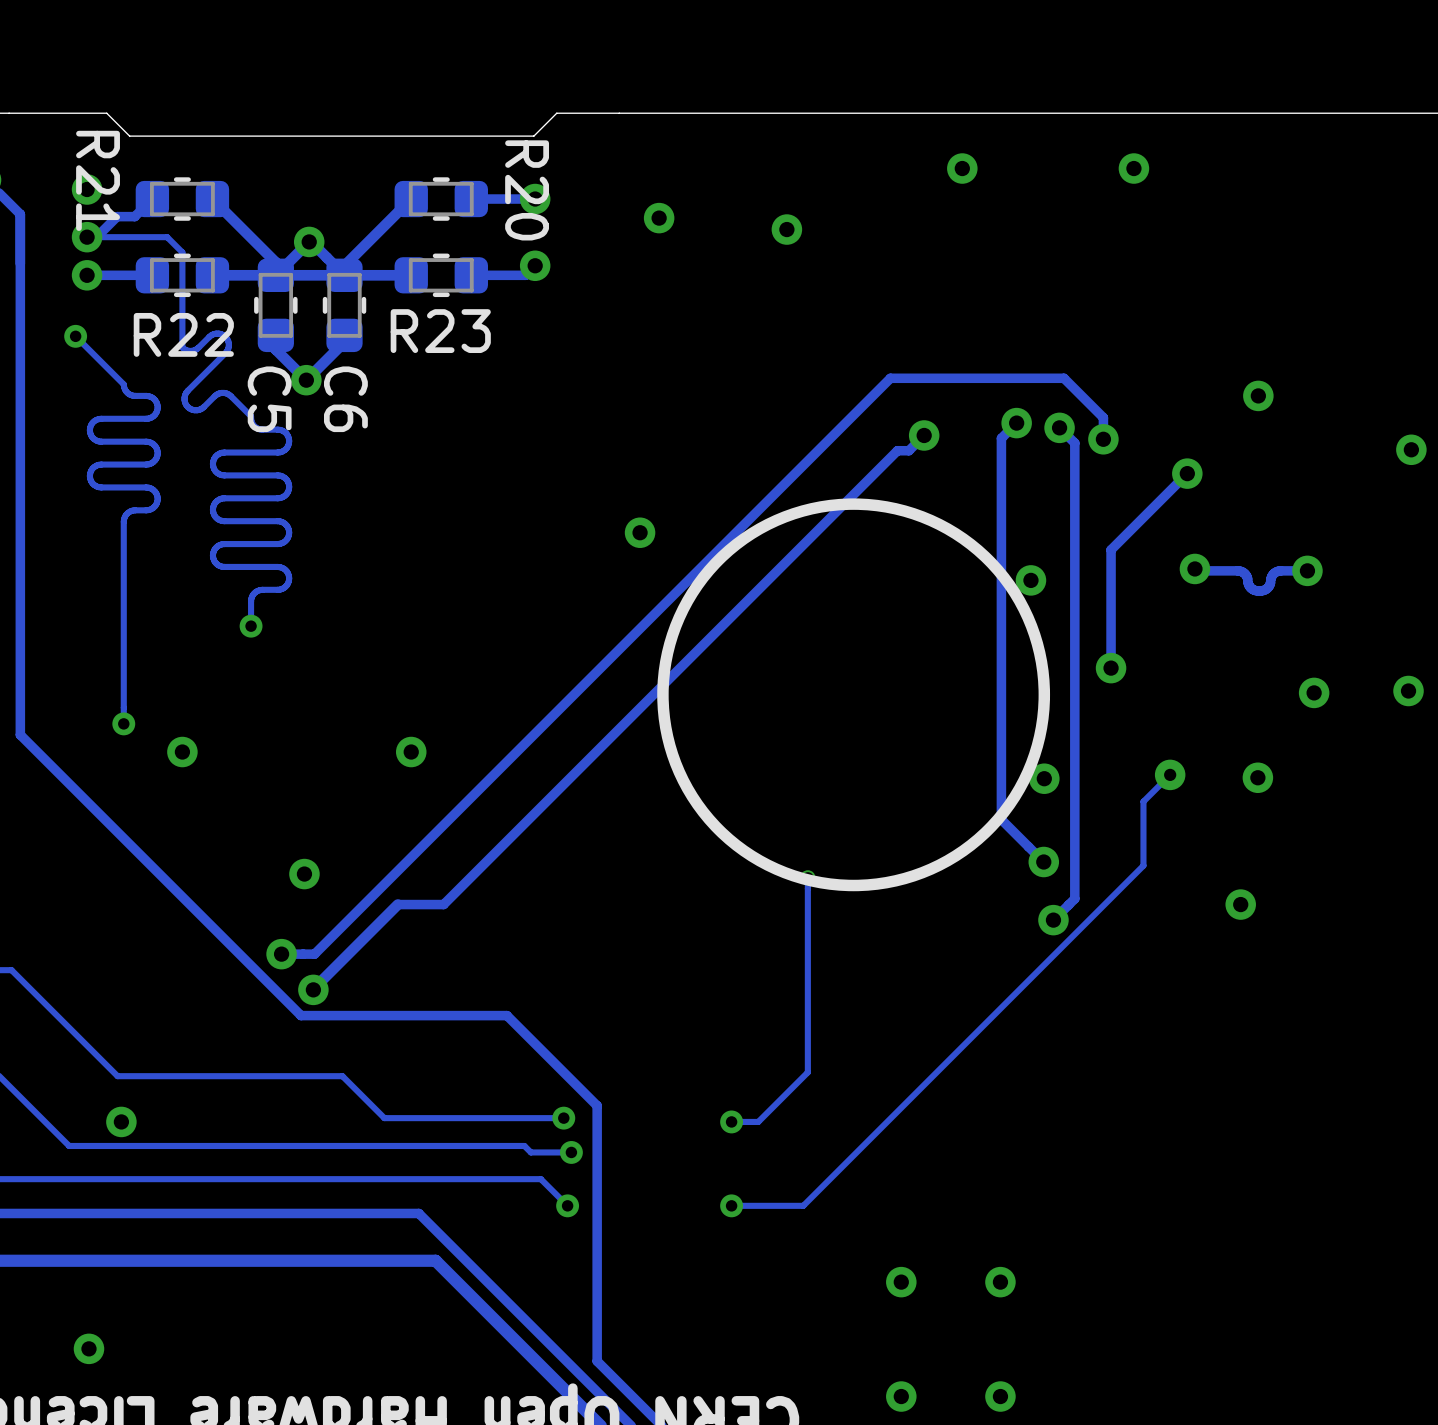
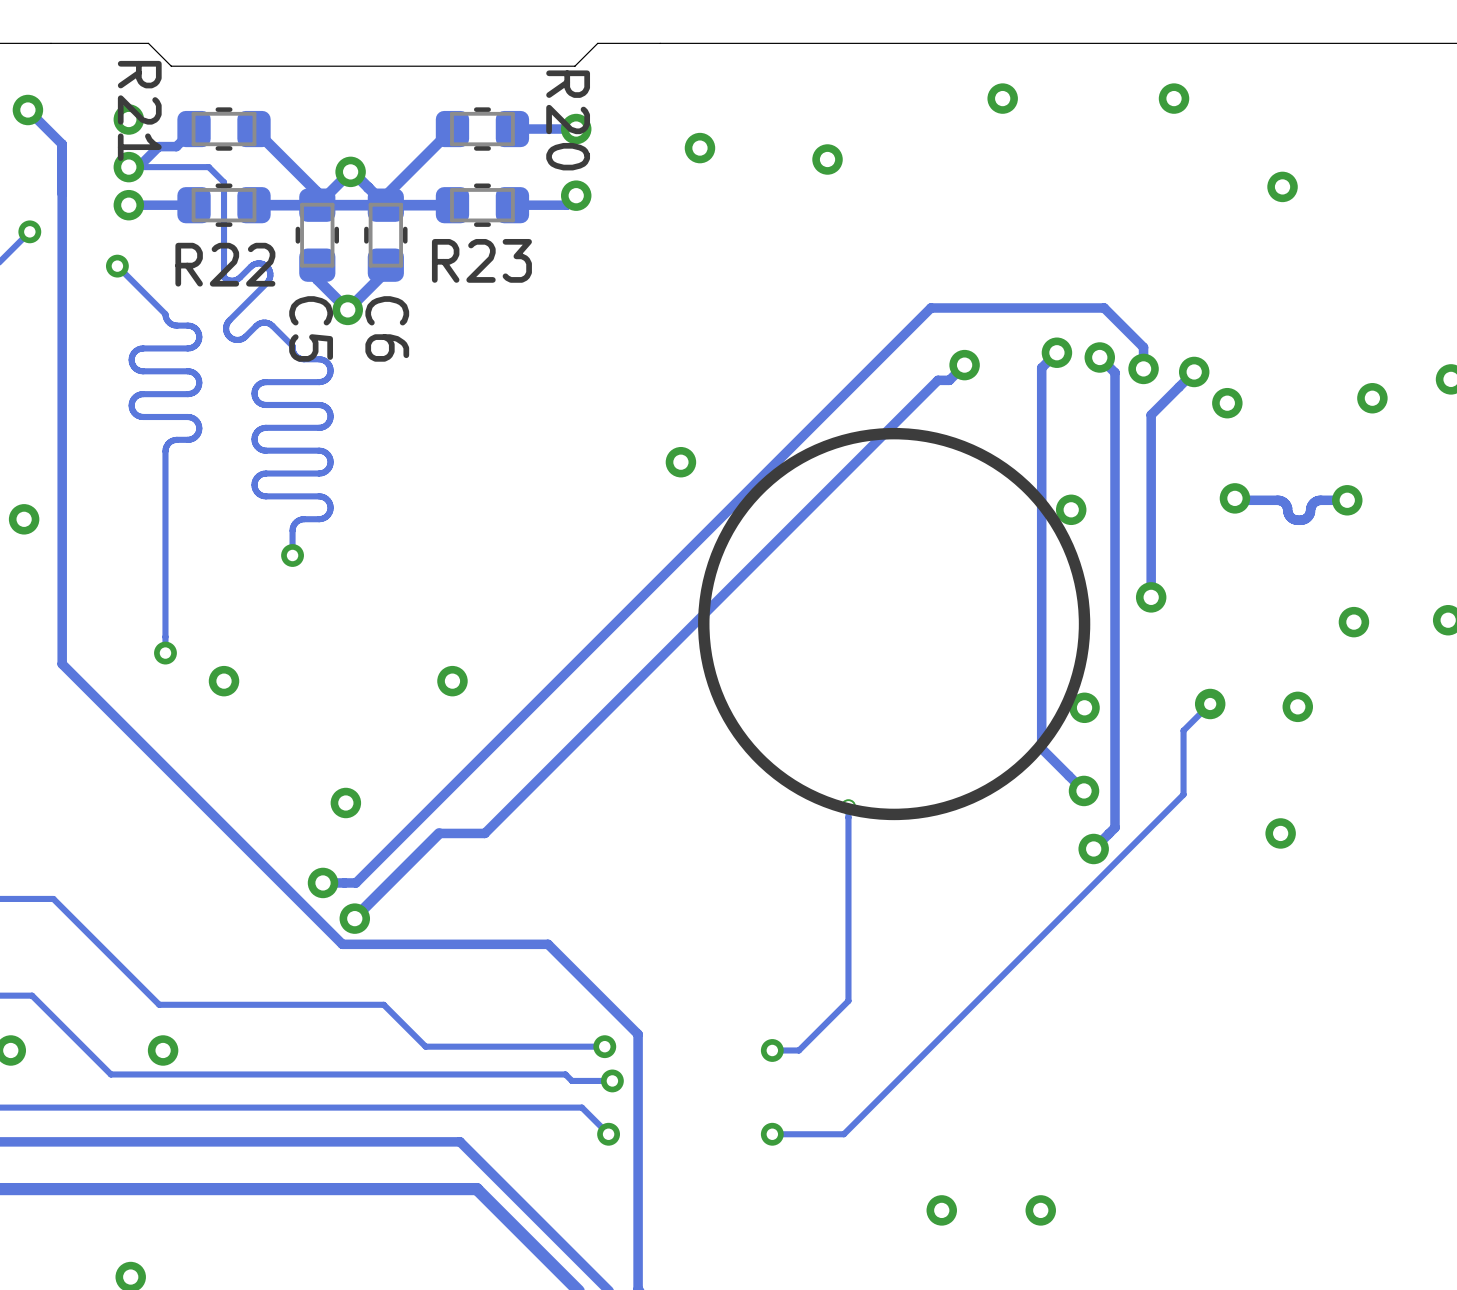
via: none -> (1282, 186)
via: (1258, 395) -> none
via: none -> (1194, 371)
via: none -> (1372, 398)
track: (1187, 473) (1111, 549) -> (1194, 371) (1151, 414) (1151, 479)

